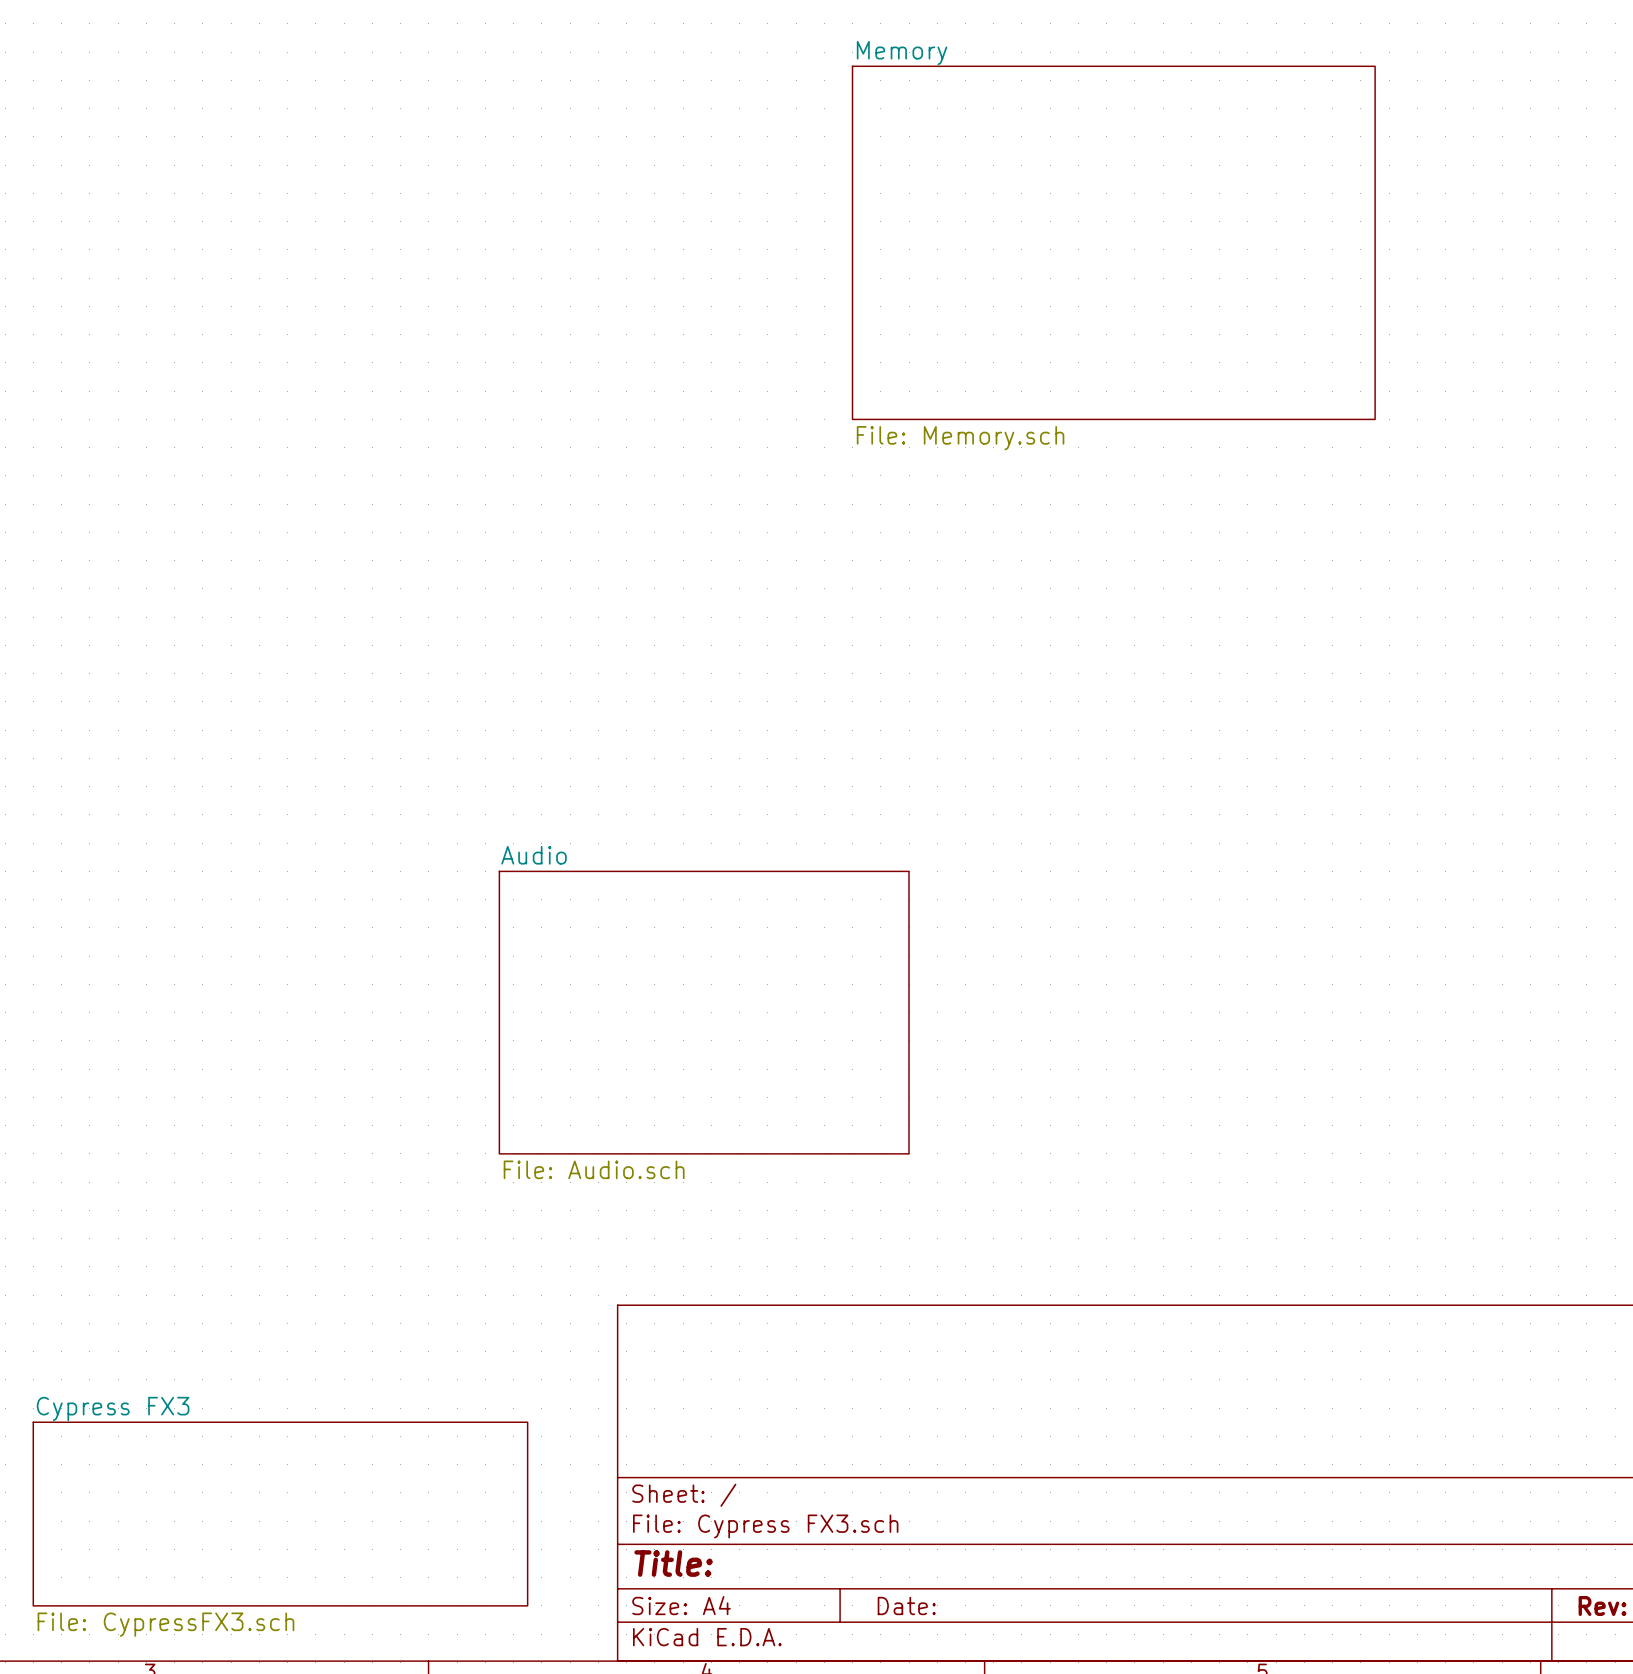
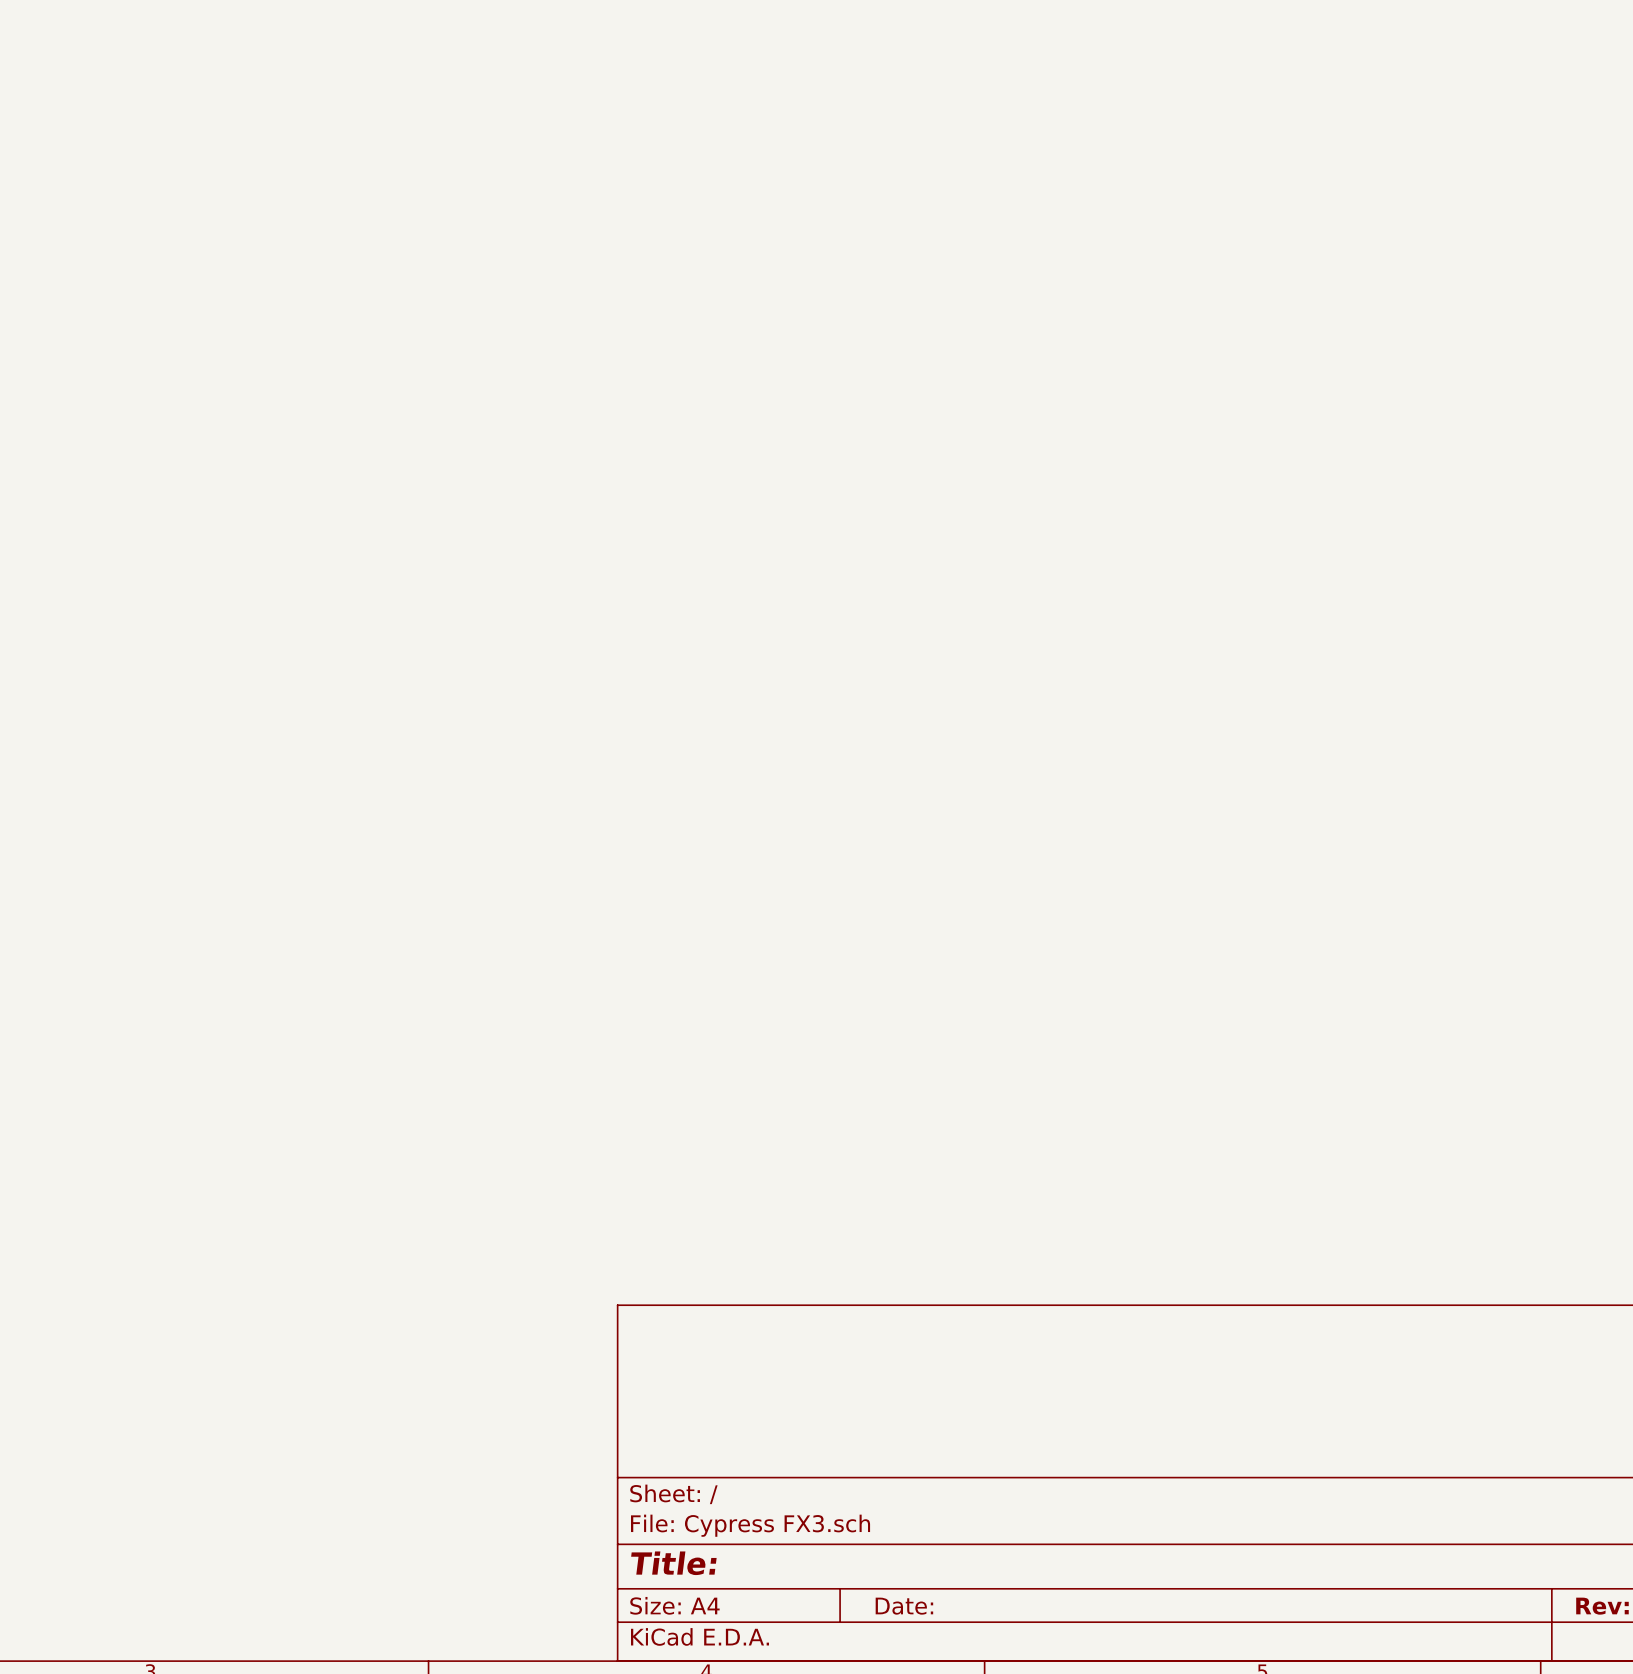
sheet Memory: File: Memory.sch (1113, 242) -> none
sheet Audio: File: Audio.sch (704, 1012) -> none
sheet Cypress FX3: File: CypressFX3.sch (280, 1514) -> none

